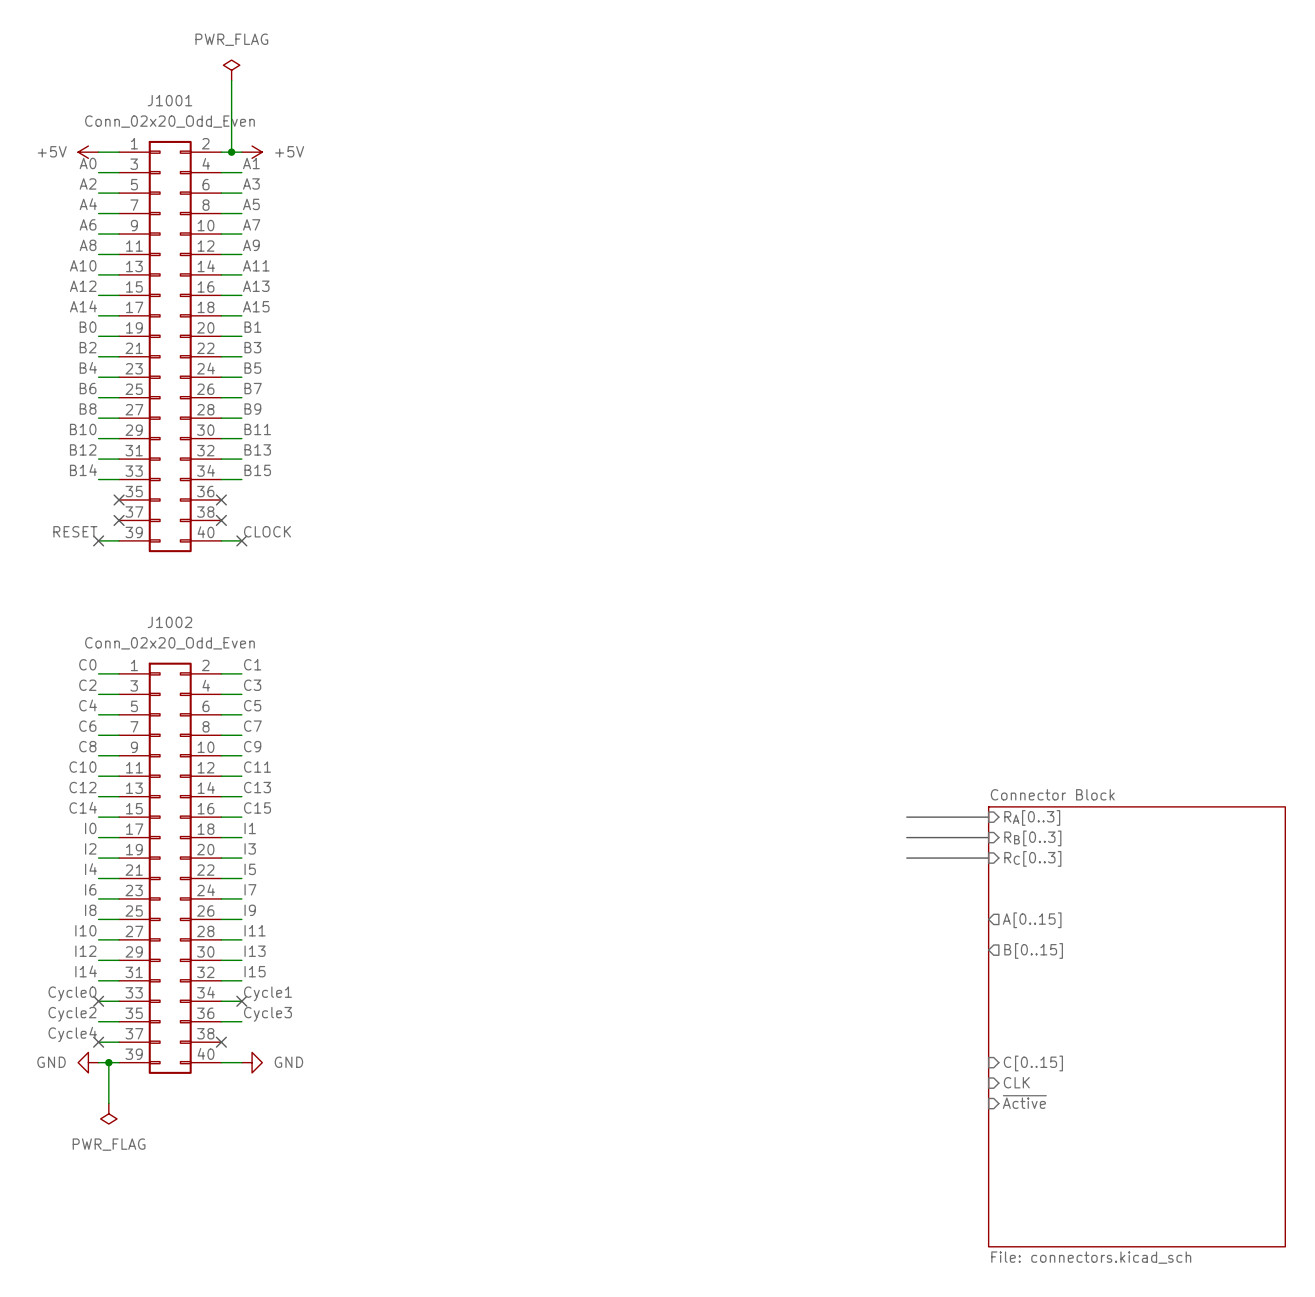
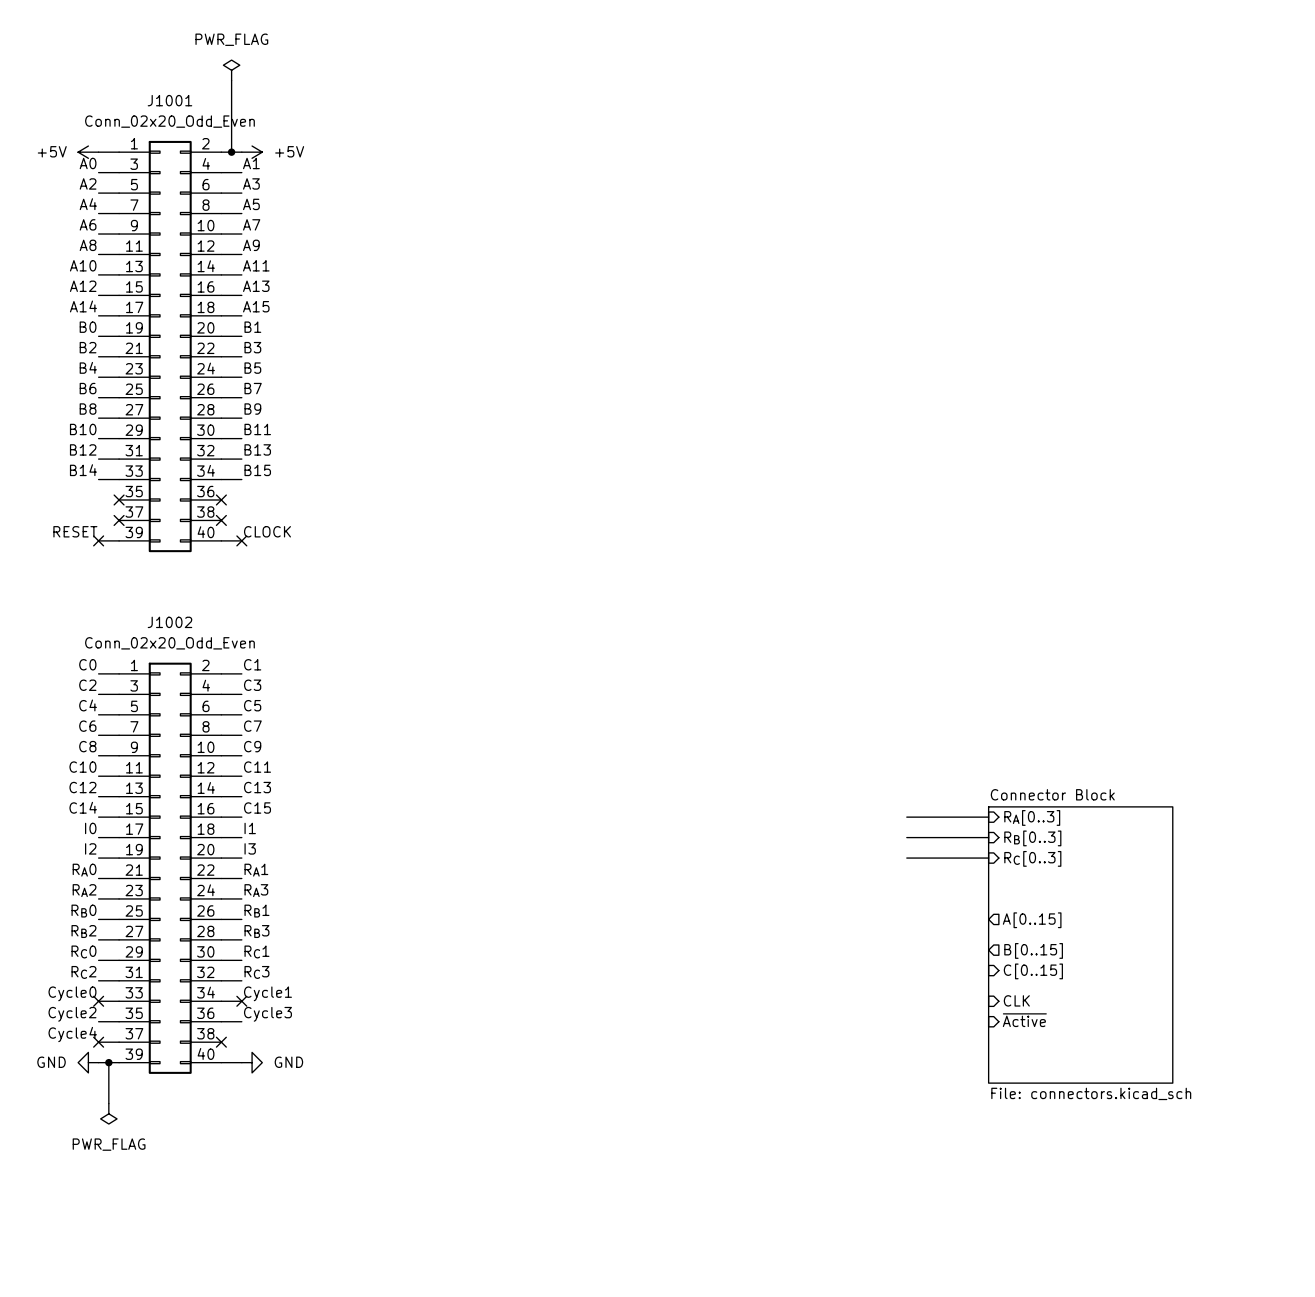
label: I4 (90, 869) -> RA0 (84, 870)
label: I5 (250, 869) -> RA1 (256, 870)
label: I6 (90, 889) -> RA2 (84, 890)
label: I7 (250, 889) -> RA3 (256, 890)
label: I8 (90, 910) -> RB0 (83, 911)
label: I9 (250, 910) -> RB1 (256, 911)
label: I10 (85, 930) -> RB2 (83, 931)
label: I11 (255, 930) -> RB3 (256, 931)
sheet Connector Block: none -> File: connectors.kicad_sch (1080, 945)
label: I12 (85, 951) -> RC0 (83, 951)
label: I13 (255, 951) -> RC1 (256, 951)
label: I14 (86, 971) -> RC2 (83, 972)
label: I15 (255, 971) -> RC3 (256, 972)
sheet Connector Block: File: connectors.kicad_sch (1136, 1026) -> none
sheet pin position: C[0..15] (1033, 1063) -> C[0..15] (1033, 971)
sheet pin position: CLK (1016, 1082) -> CLK (1016, 1000)
sheet pin position: ~{Active} (1024, 1102) -> ~{Active} (1024, 1020)

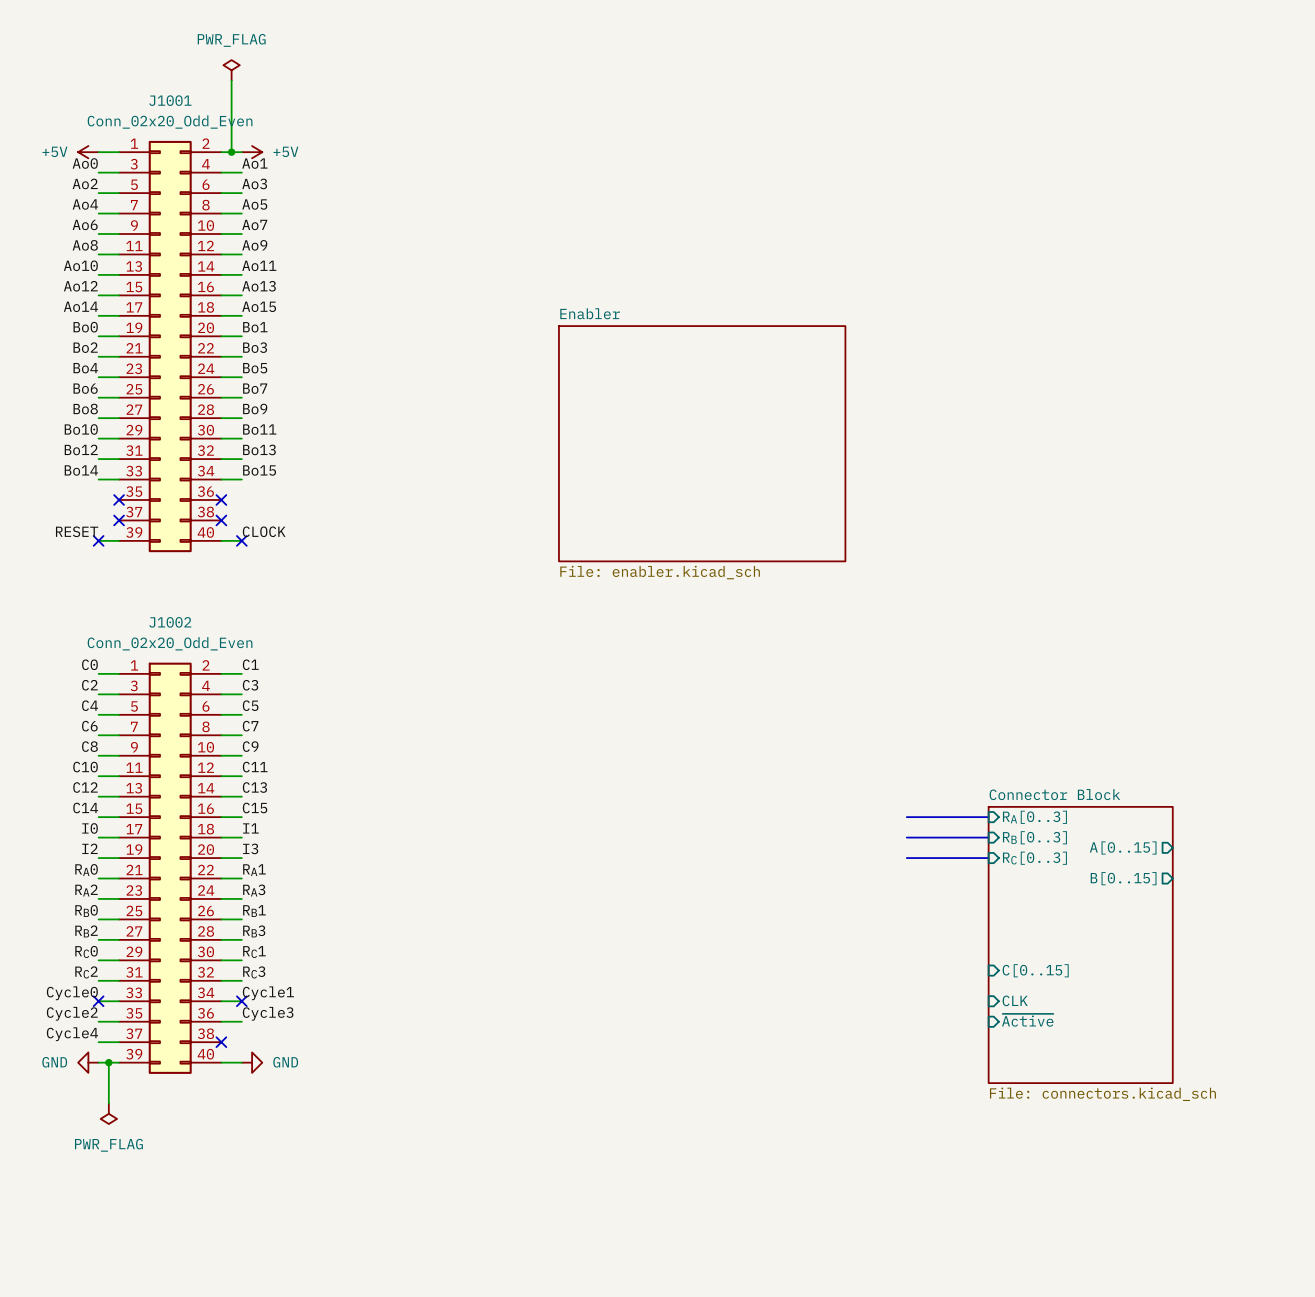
label: A0 (88, 163) -> Ao0 (85, 163)
label: A1 (251, 163) -> Ao1 (254, 163)
label: A2 (88, 183) -> Ao2 (85, 183)
label: A3 (251, 183) -> Ao3 (254, 183)
label: A4 (88, 204) -> Ao4 (85, 204)
label: A5 (251, 204) -> Ao5 (254, 204)
label: A6 (88, 224) -> Ao6 (85, 224)
label: A7 (251, 224) -> Ao7 (254, 224)
label: A8 (88, 245) -> Ao8 (85, 245)
label: A9 (251, 245) -> Ao9 (254, 245)
label: A10 (83, 265) -> Ao10 (80, 265)
label: A11 (256, 265) -> Ao11 (259, 265)
label: A12 (83, 286) -> Ao12 (80, 286)
label: A13 (256, 286) -> Ao13 (259, 286)
label: A14 (83, 306) -> Ao14 (80, 306)
label: A15 (256, 306) -> Ao15 (259, 306)
label: B0 (88, 327) -> Bo0 (85, 327)
label: B1 (252, 327) -> Bo1 (255, 327)
label: B2 (88, 347) -> Bo2 (85, 347)
label: B3 (252, 347) -> Bo3 (255, 347)
label: B4 (88, 367) -> Bo4 (85, 368)
label: B5 (252, 368) -> Bo5 (255, 368)
label: B6 (88, 388) -> Bo6 (85, 388)
label: B7 (253, 388) -> Bo7 (255, 388)
label: B8 (88, 409) -> Bo8 (85, 409)
label: B9 (252, 409) -> Bo9 (255, 409)
label: B10 (83, 429) -> Bo10 (81, 429)
label: B11 (257, 429) -> Bo11 (259, 429)
sheet Enabler: none -> File: enabler.kicad_sch (702, 443)
label: B12 (83, 449) -> Bo12 (81, 449)
label: B13 (257, 449) -> Bo13 (259, 449)
label: B14 (83, 470) -> Bo14 (81, 470)
label: B15 (257, 470) -> Bo15 (259, 470)
sheet pin rotation: 0° (1032, 920) -> 180° (1123, 847)
sheet pin position: A[0..15] (1032, 920) -> A[0..15] (1123, 847)
sheet pin rotation: 0° (1033, 950) -> 180° (1123, 878)
sheet pin position: B[0..15] (1033, 950) -> B[0..15] (1123, 878)
no-connect mark: (98, 1042) -> none

